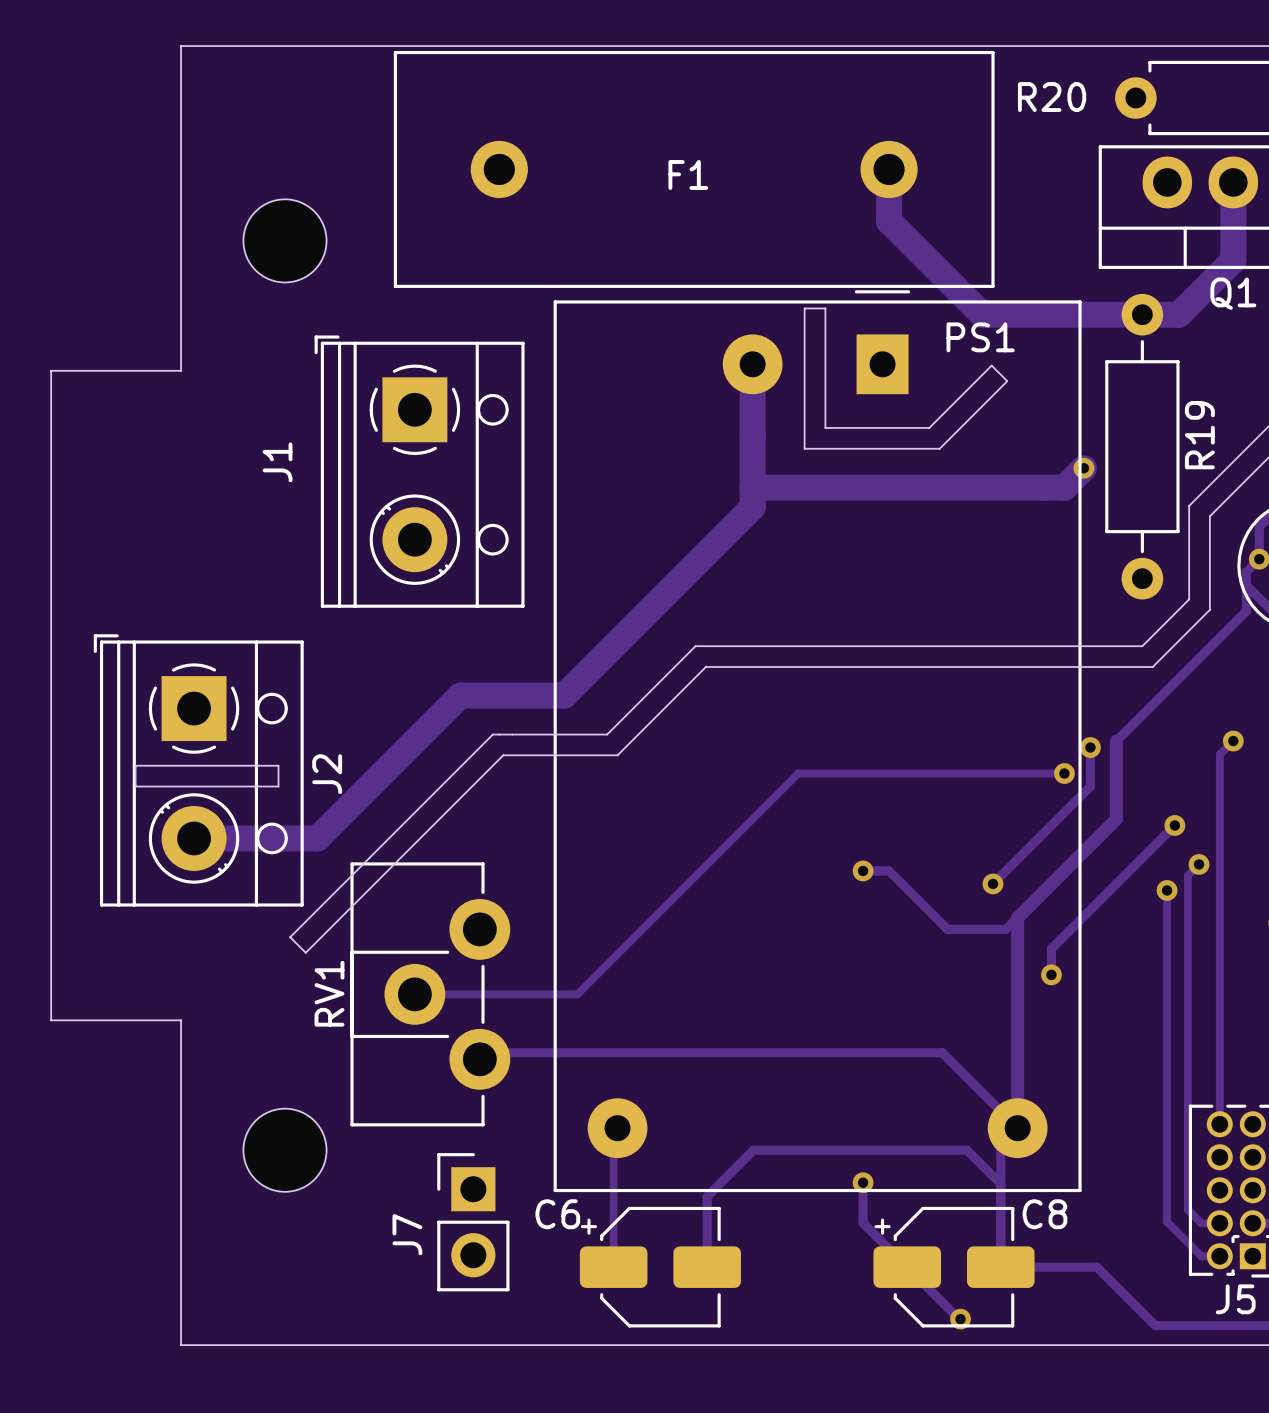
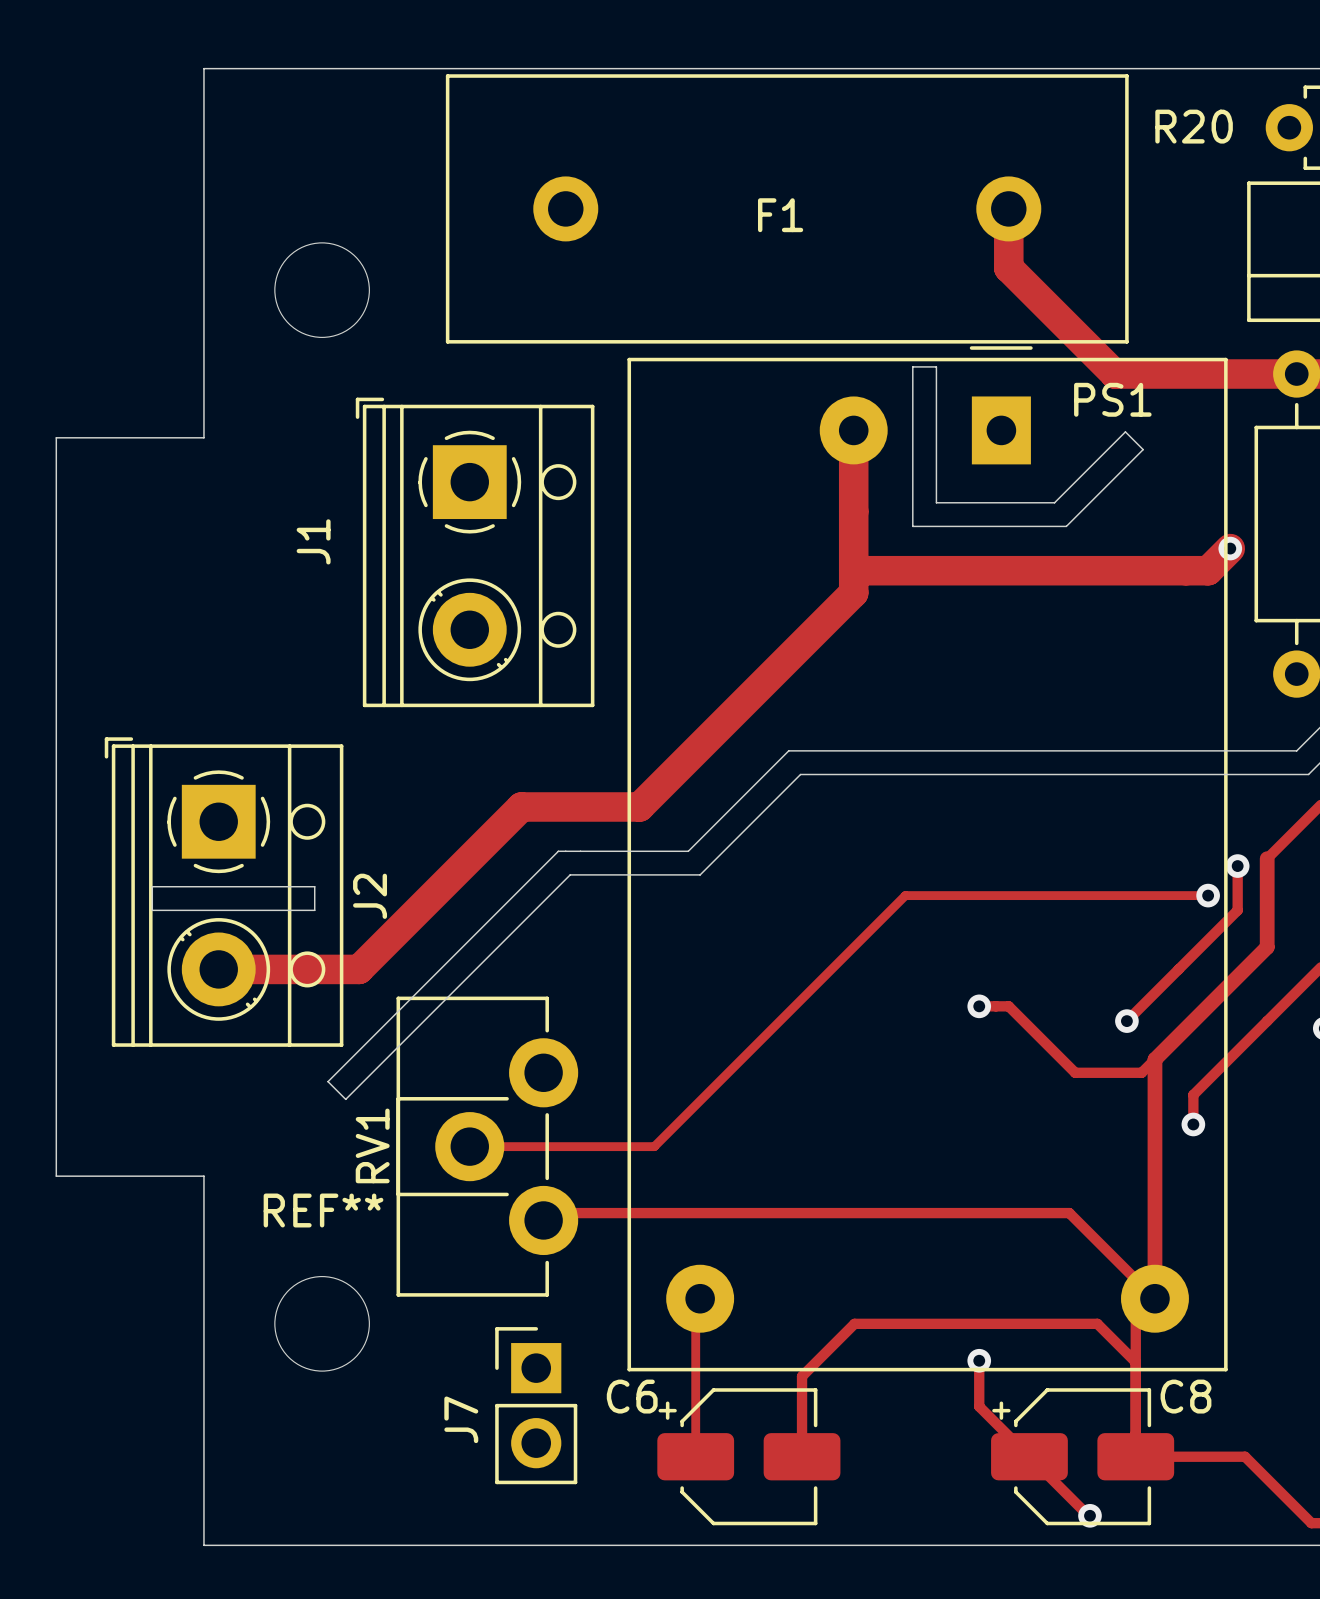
REF** name: none -> REF** (323, 1210)

